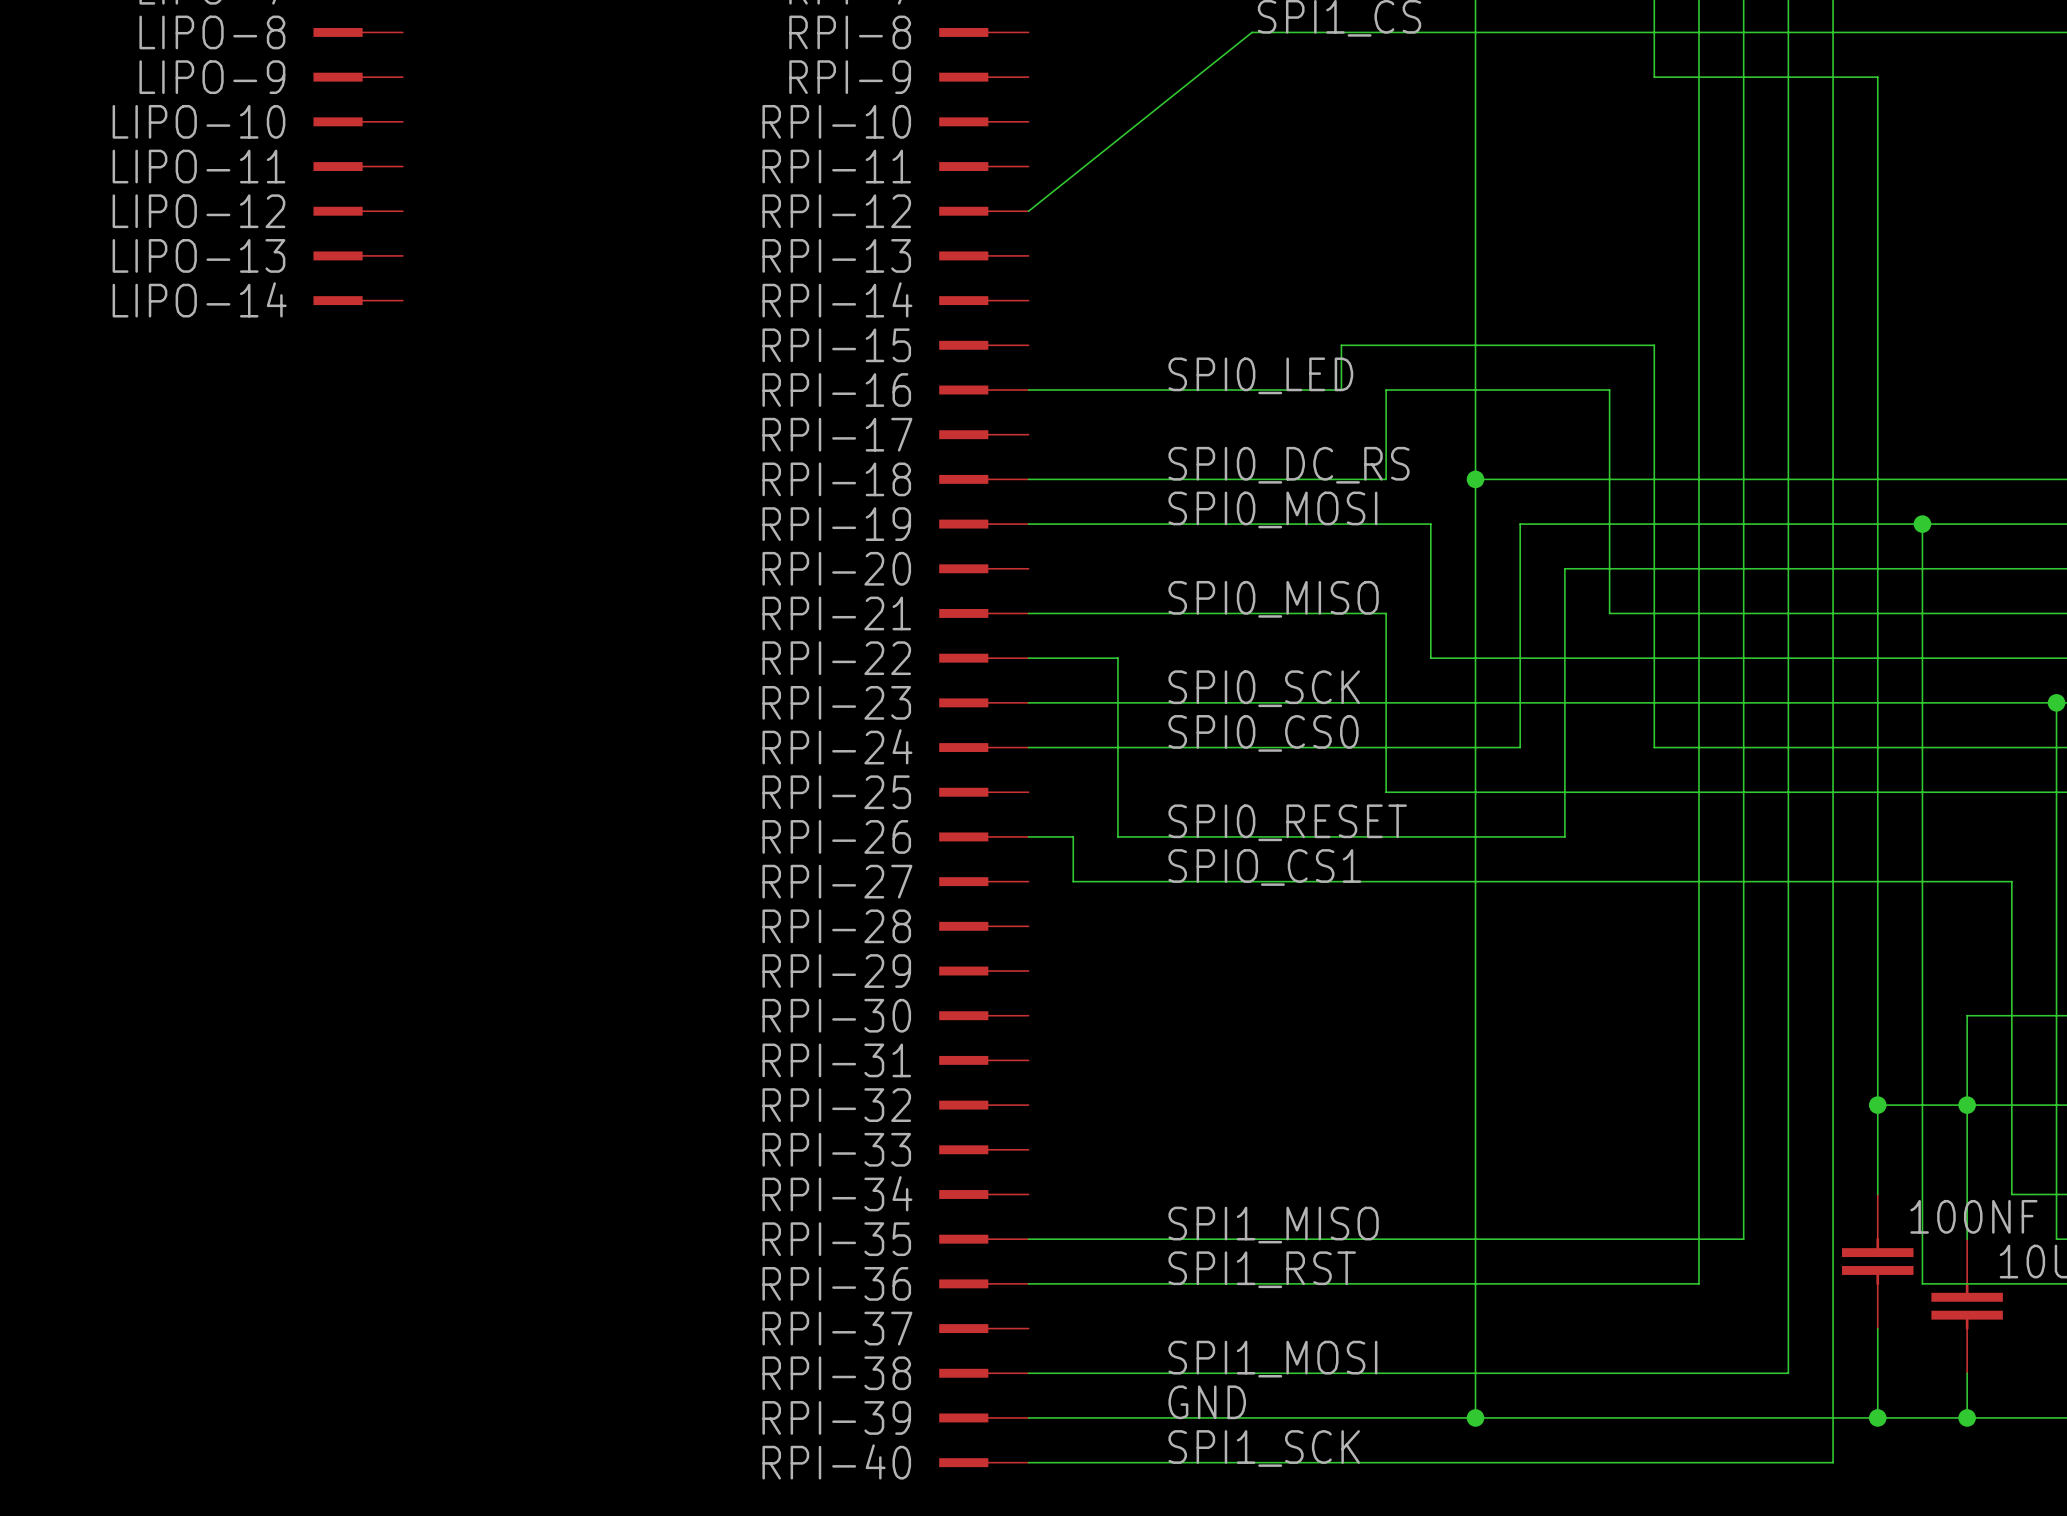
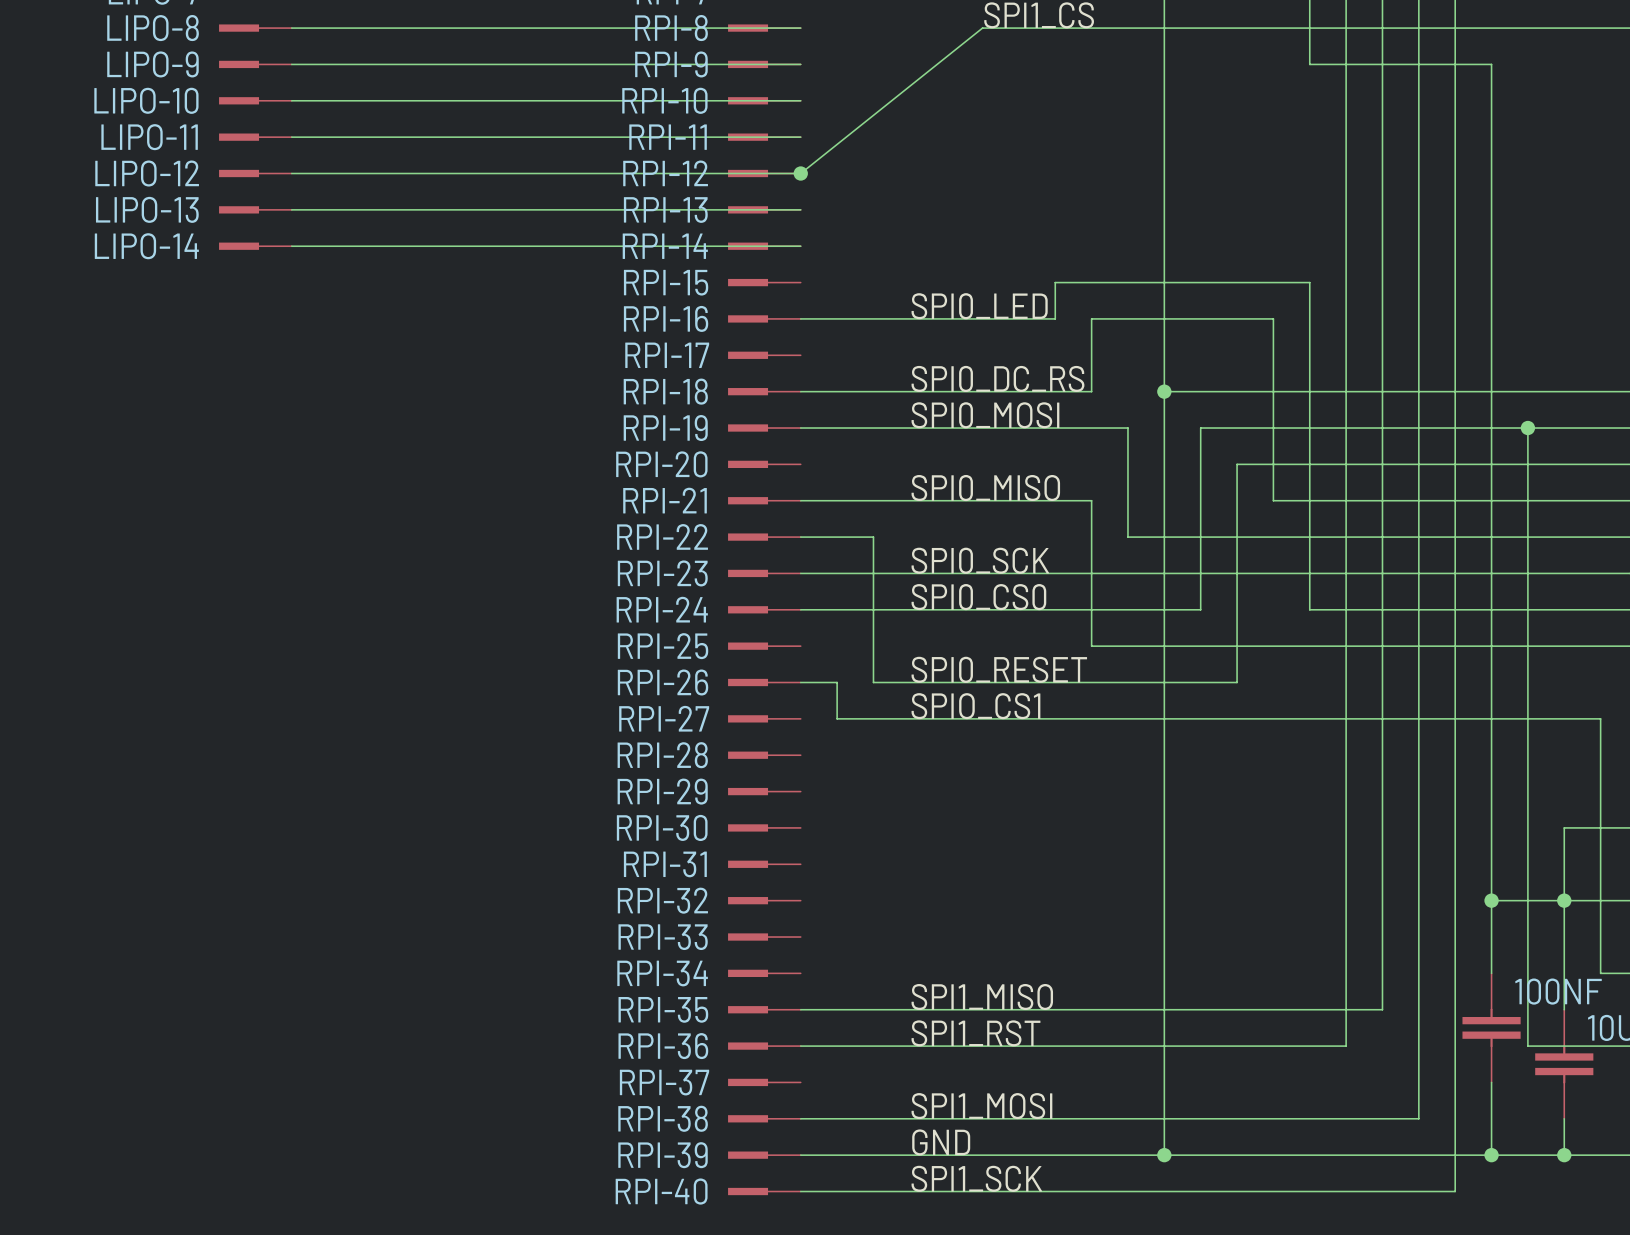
wire: none -> (291, 28) (800, 28)
wire: none -> (291, 64) (800, 64)
wire: none -> (291, 100) (800, 100)
wire: none -> (291, 137) (800, 137)
wire: none -> (291, 173) (800, 173)
junction: none -> (800, 173)
wire: none -> (291, 209) (800, 209)
wire: none -> (291, 246) (800, 246)

